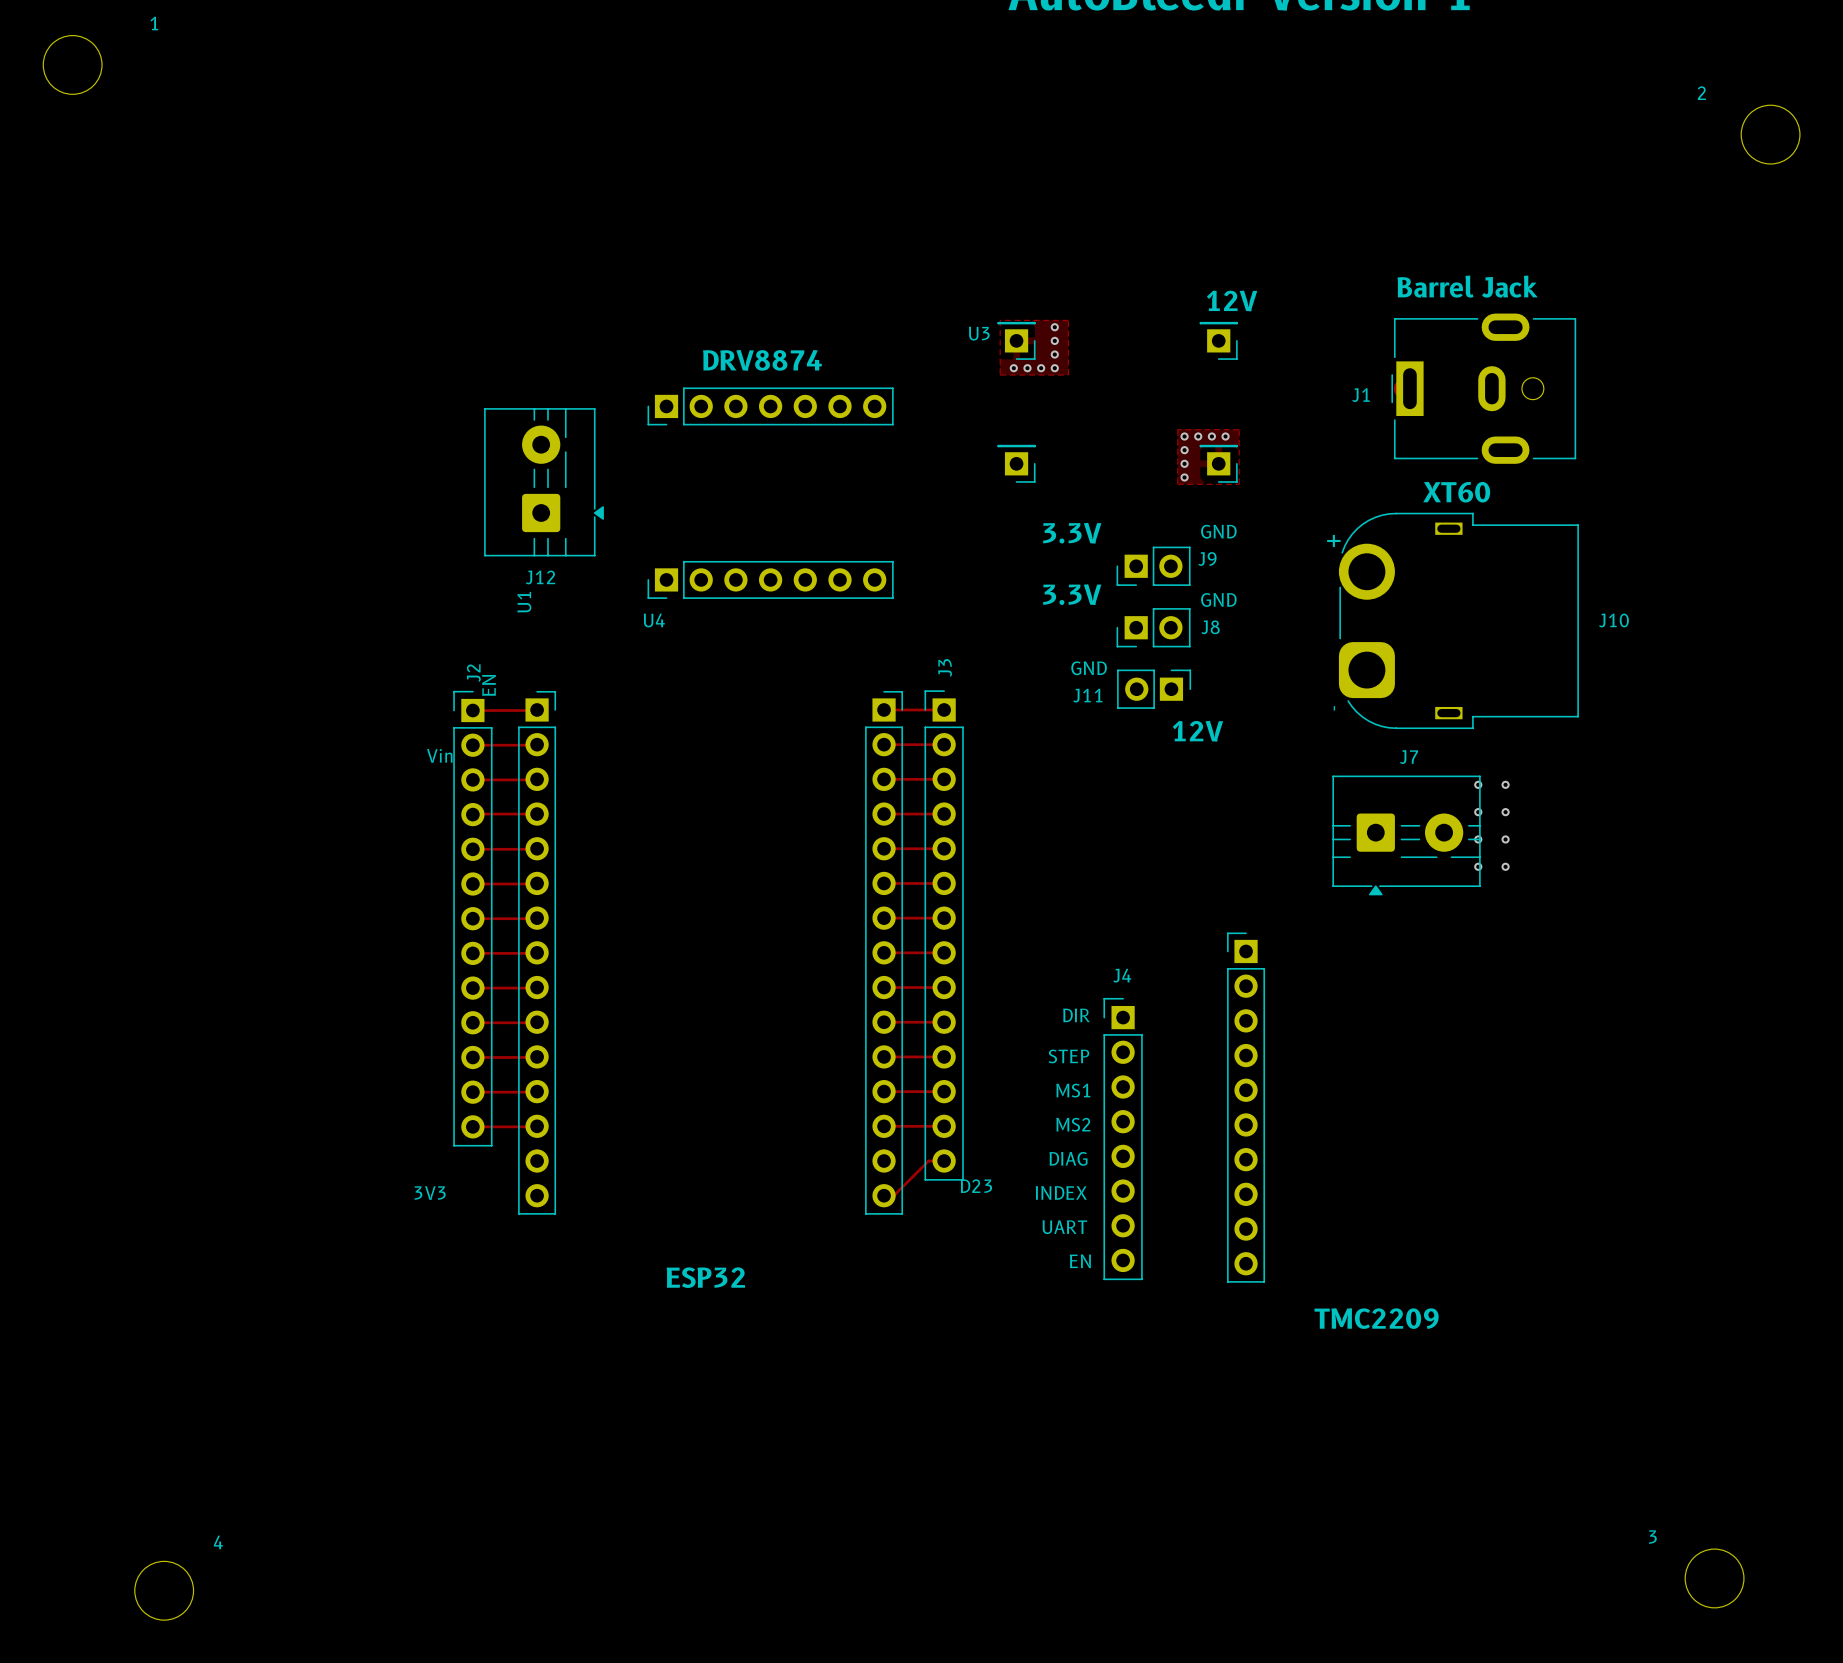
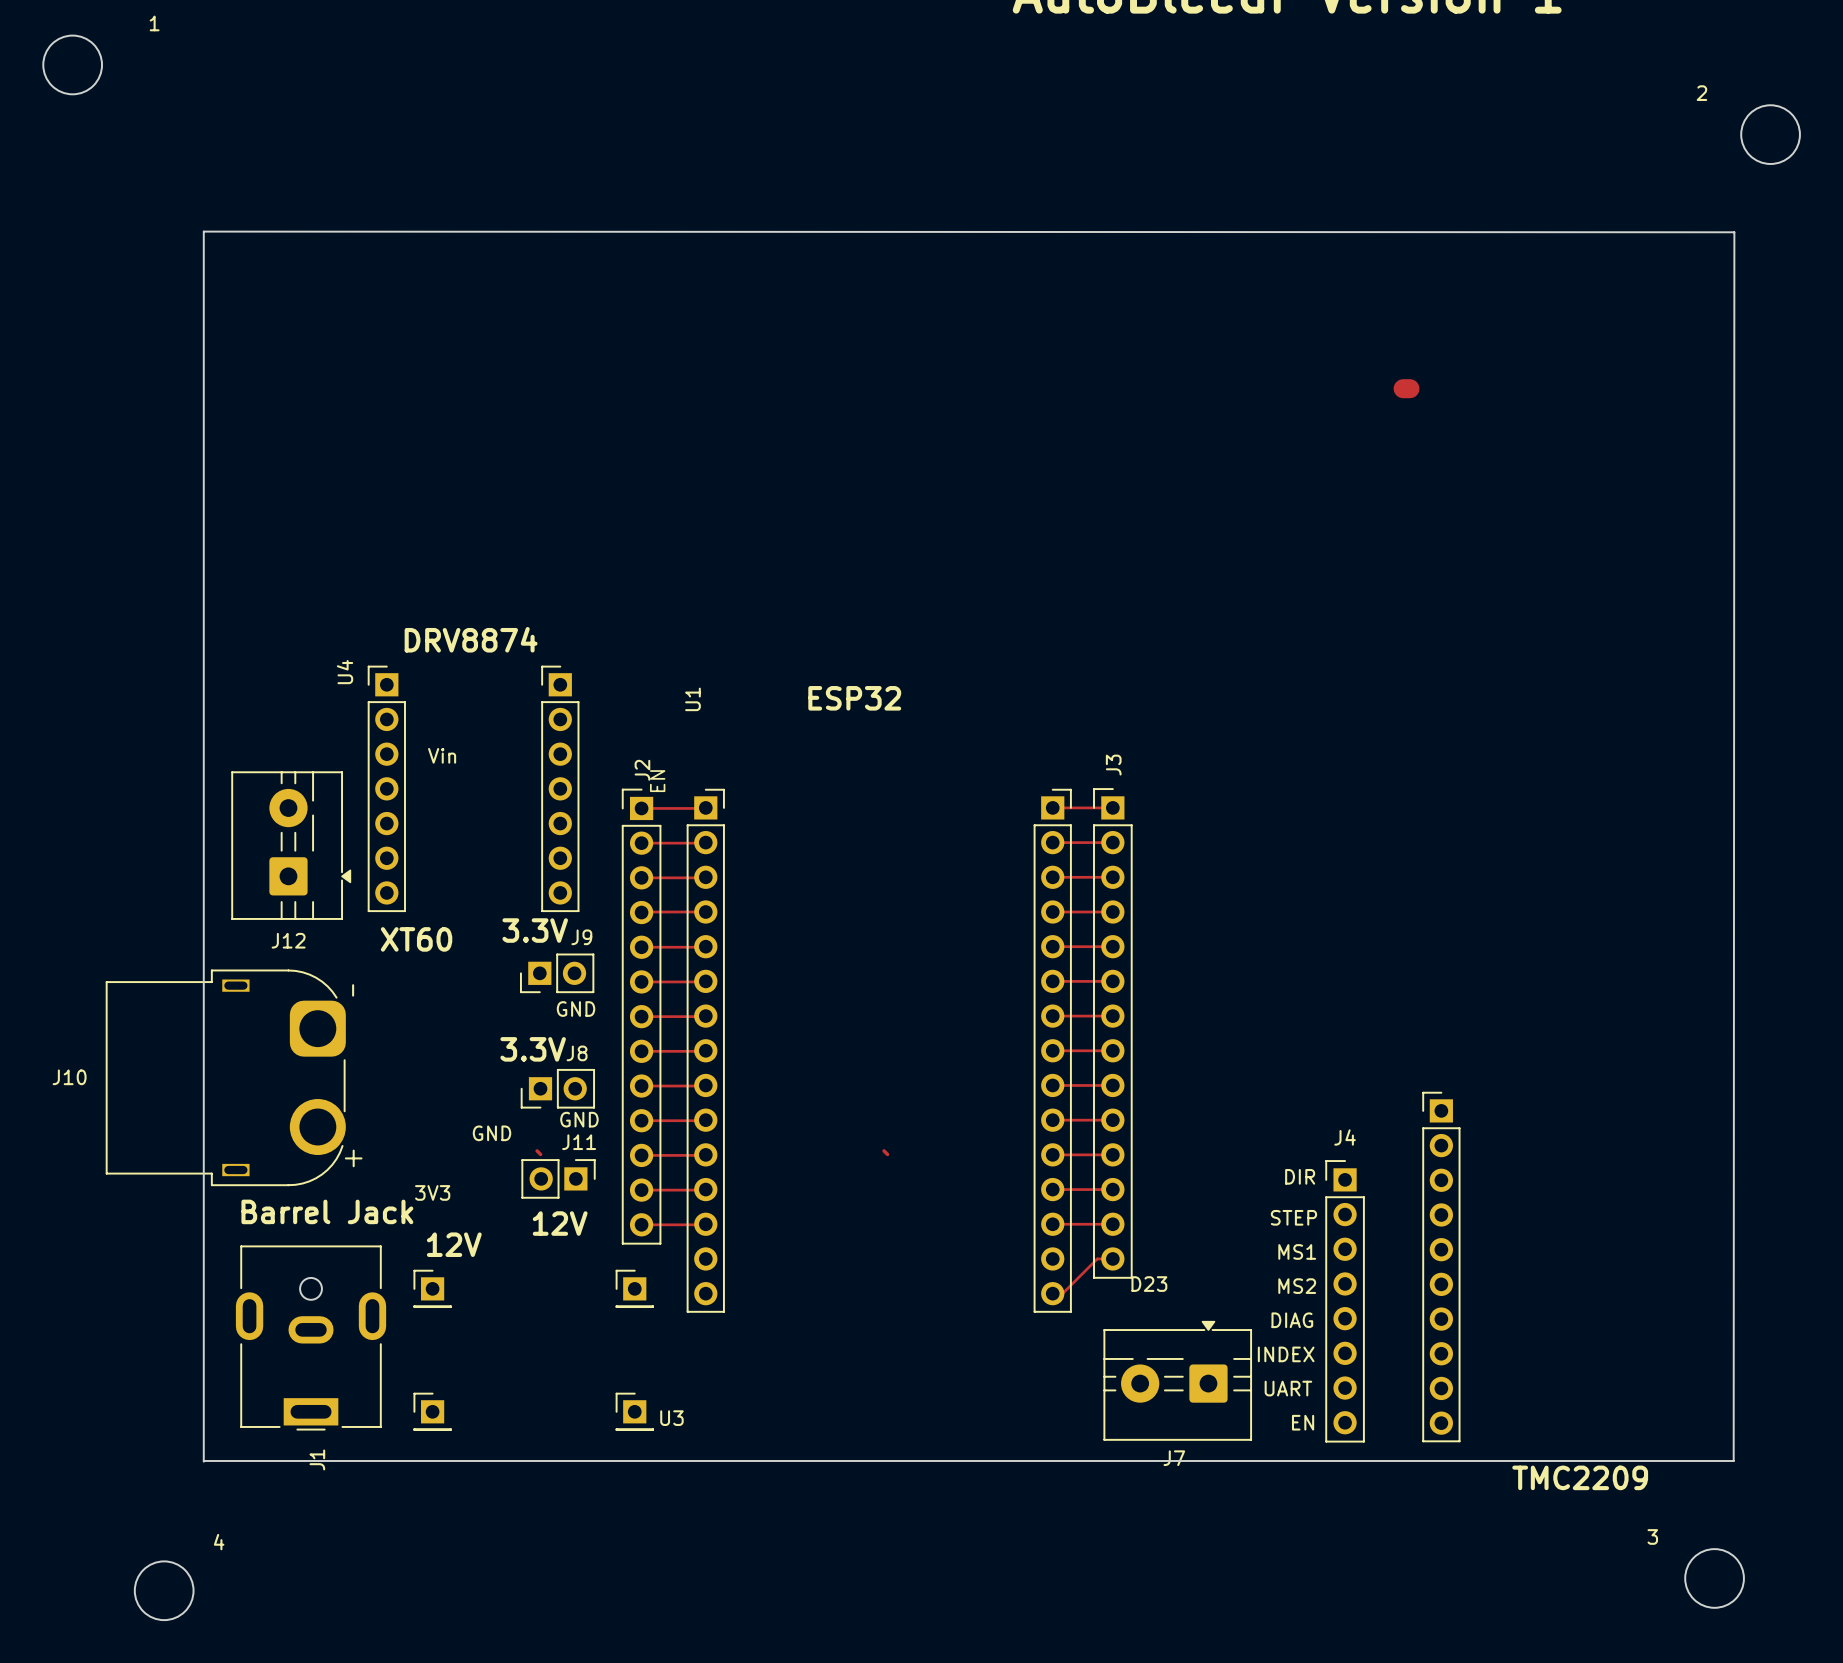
text: Barrel Jack (1467, 286) -> none
text: 12V (1232, 300) -> none
zone outline: (1000, 320) (1000, 375) (1068, 375) (1068, 320) (1000, 320) -> none
via: (1054, 327) -> none
via: (1054, 340) -> none
via: (1054, 354) -> none
text: DRV8874 (762, 360) -> none
via: (1013, 368) -> none
via: (1027, 368) -> none
via: (1041, 368) -> none
via: (1054, 368) -> none
J1 rotation: 0° (1483, 388) -> 90° counterclockwise (311, 1337)
J1 position: (1483, 388) -> (311, 1337)
U3 rotation: 0° (1117, 402) -> 180° (533, 1350)
U3 position: (1117, 402) -> (533, 1350)
zone outline: (1177, 429) (1239, 429) (1239, 484) (1177, 484) (1177, 429) -> none
via: (1184, 436) -> none
via: (1198, 436) -> none
via: (1211, 436) -> none
via: (1225, 436) -> none
via: (1184, 450) -> none
via: (1184, 463) -> none
via: (1184, 477) -> none
J12 position: (543, 482) -> (291, 845)
text: XT60 (1456, 492) -> none
U4 rotation: 0° (770, 493) -> 90° clockwise (473, 788)
U4 position: (770, 493) -> (473, 788)
text: GND (1218, 531) -> none
text: 3.3V (1072, 533) -> none
J9 name position: J9 (1207, 559) -> J9 (581, 937)
J9 position: (1153, 566) -> (557, 973)
text: 3.3V (1072, 594) -> none
text: GND (1218, 599) -> none
J10 rotation: 0° (1458, 620) -> 180° (225, 1077)
J10 position: (1458, 620) -> (225, 1077)
J8 position: (1153, 627) -> (557, 1088)
J8 name position: J8 (1210, 627) -> J8 (577, 1053)
text: none -> DRV8874 (471, 639)
text: GND (1089, 668) -> none
J11 position: (1154, 689) -> (558, 1178)
J11 name position: J11 (1087, 695) -> J11 (579, 1142)
text: none -> ESP32 (854, 698)
track: (537, 709) (472, 710) -> (705, 807) (641, 808)
track: (884, 709) (944, 709) -> (1052, 807) (1112, 807)
text: 12V (1197, 731) -> none
track: (537, 744) (472, 745) -> (705, 842) (641, 843)
track: (884, 744) (944, 744) -> (1052, 842) (1112, 842)
track: (537, 779) (472, 779) -> (705, 877) (641, 877)
track: (884, 779) (944, 779) -> (1052, 877) (1112, 877)
via: (1478, 784) -> none
via: (1505, 784) -> none
via: (1478, 812) -> none
via: (1505, 812) -> none
track: (537, 814) (472, 814) -> (705, 912) (641, 912)
track: (884, 814) (944, 814) -> (1052, 912) (1112, 912)
J7 rotation: 0° (1406, 835) -> 180° (1177, 1380)
J7 position: (1406, 835) -> (1177, 1380)
via: (1478, 839) -> none
via: (1505, 839) -> none
track: (537, 848) (472, 849) -> (705, 946) (641, 947)
track: (884, 848) (944, 848) -> (1052, 946) (1112, 946)
via: (1478, 866) -> none
via: (1505, 866) -> none
track: (537, 883) (472, 883) -> (705, 981) (641, 981)
track: (884, 883) (944, 883) -> (1052, 981) (1112, 981)
J2 position: (472, 918) -> (641, 1016)
track: (537, 918) (472, 918) -> (705, 1016) (641, 1016)
track: (884, 918) (944, 918) -> (1052, 1016) (1112, 1016)
text: none -> 3.3V (535, 930)
J3 position: (944, 935) -> (1112, 1033)
text: none -> XT60 (416, 939)
track: (537, 952) (472, 953) -> (705, 1050) (641, 1051)
U1 position: (710, 952) -> (879, 1050)
track: (884, 952) (944, 952) -> (1052, 1050) (1112, 1050)
track: (537, 987) (472, 988) -> (705, 1085) (641, 1086)
track: (884, 987) (944, 987) -> (1052, 1085) (1112, 1085)
text: none -> GND (576, 1009)
text position: DIR (1076, 1015) -> DIR (1300, 1176)
track: (537, 1022) (472, 1022) -> (705, 1120) (641, 1120)
track: (884, 1022) (944, 1022) -> (1052, 1120) (1112, 1120)
text: none -> 3.3V (533, 1049)
track: (537, 1056) (472, 1057) -> (705, 1154) (641, 1155)
track: (884, 1056) (944, 1056) -> (1052, 1154) (1112, 1154)
text position: STEP (1068, 1056) -> STEP (1293, 1217)
text position: MS1 (1073, 1090) -> MS1 (1297, 1251)
track: (537, 1091) (472, 1092) -> (705, 1189) (641, 1190)
track: (884, 1091) (944, 1091) -> (1052, 1189) (1112, 1189)
part position: (1246, 1107) -> (1441, 1267)
text: none -> GND (579, 1119)
text position: MS2 (1073, 1124) -> MS2 (1297, 1286)
track: (537, 1126) (472, 1126) -> (705, 1224) (641, 1224)
track: (884, 1126) (944, 1126) -> (1052, 1224) (1112, 1224)
text: none -> GND (492, 1133)
J4 position: (1123, 1139) -> (1345, 1301)
text position: DIAG (1068, 1158) -> DIAG (1292, 1320)
track: (944, 1161) (928, 1161) (893, 1195) (884, 1195) -> (1112, 1258) (1097, 1258) (1062, 1293) (1052, 1293)
text position: D23 (976, 1186) -> D23 (1149, 1284)
text position: INDEX (1061, 1192) -> INDEX (1286, 1354)
text: none -> Barrel Jack (327, 1211)
text: none -> 12V (560, 1223)
text position: UART (1064, 1227) -> UART (1288, 1388)
text: none -> 12V (454, 1244)
text position: EN (1080, 1261) -> EN (1303, 1422)
text: ESP32 (705, 1277) -> none
text position: TMC2209 (1376, 1318) -> TMC2209 (1580, 1477)
board edge: none -> (203, 1460) (1733, 1460) (1734, 232) (203, 231) (203, 1461)

